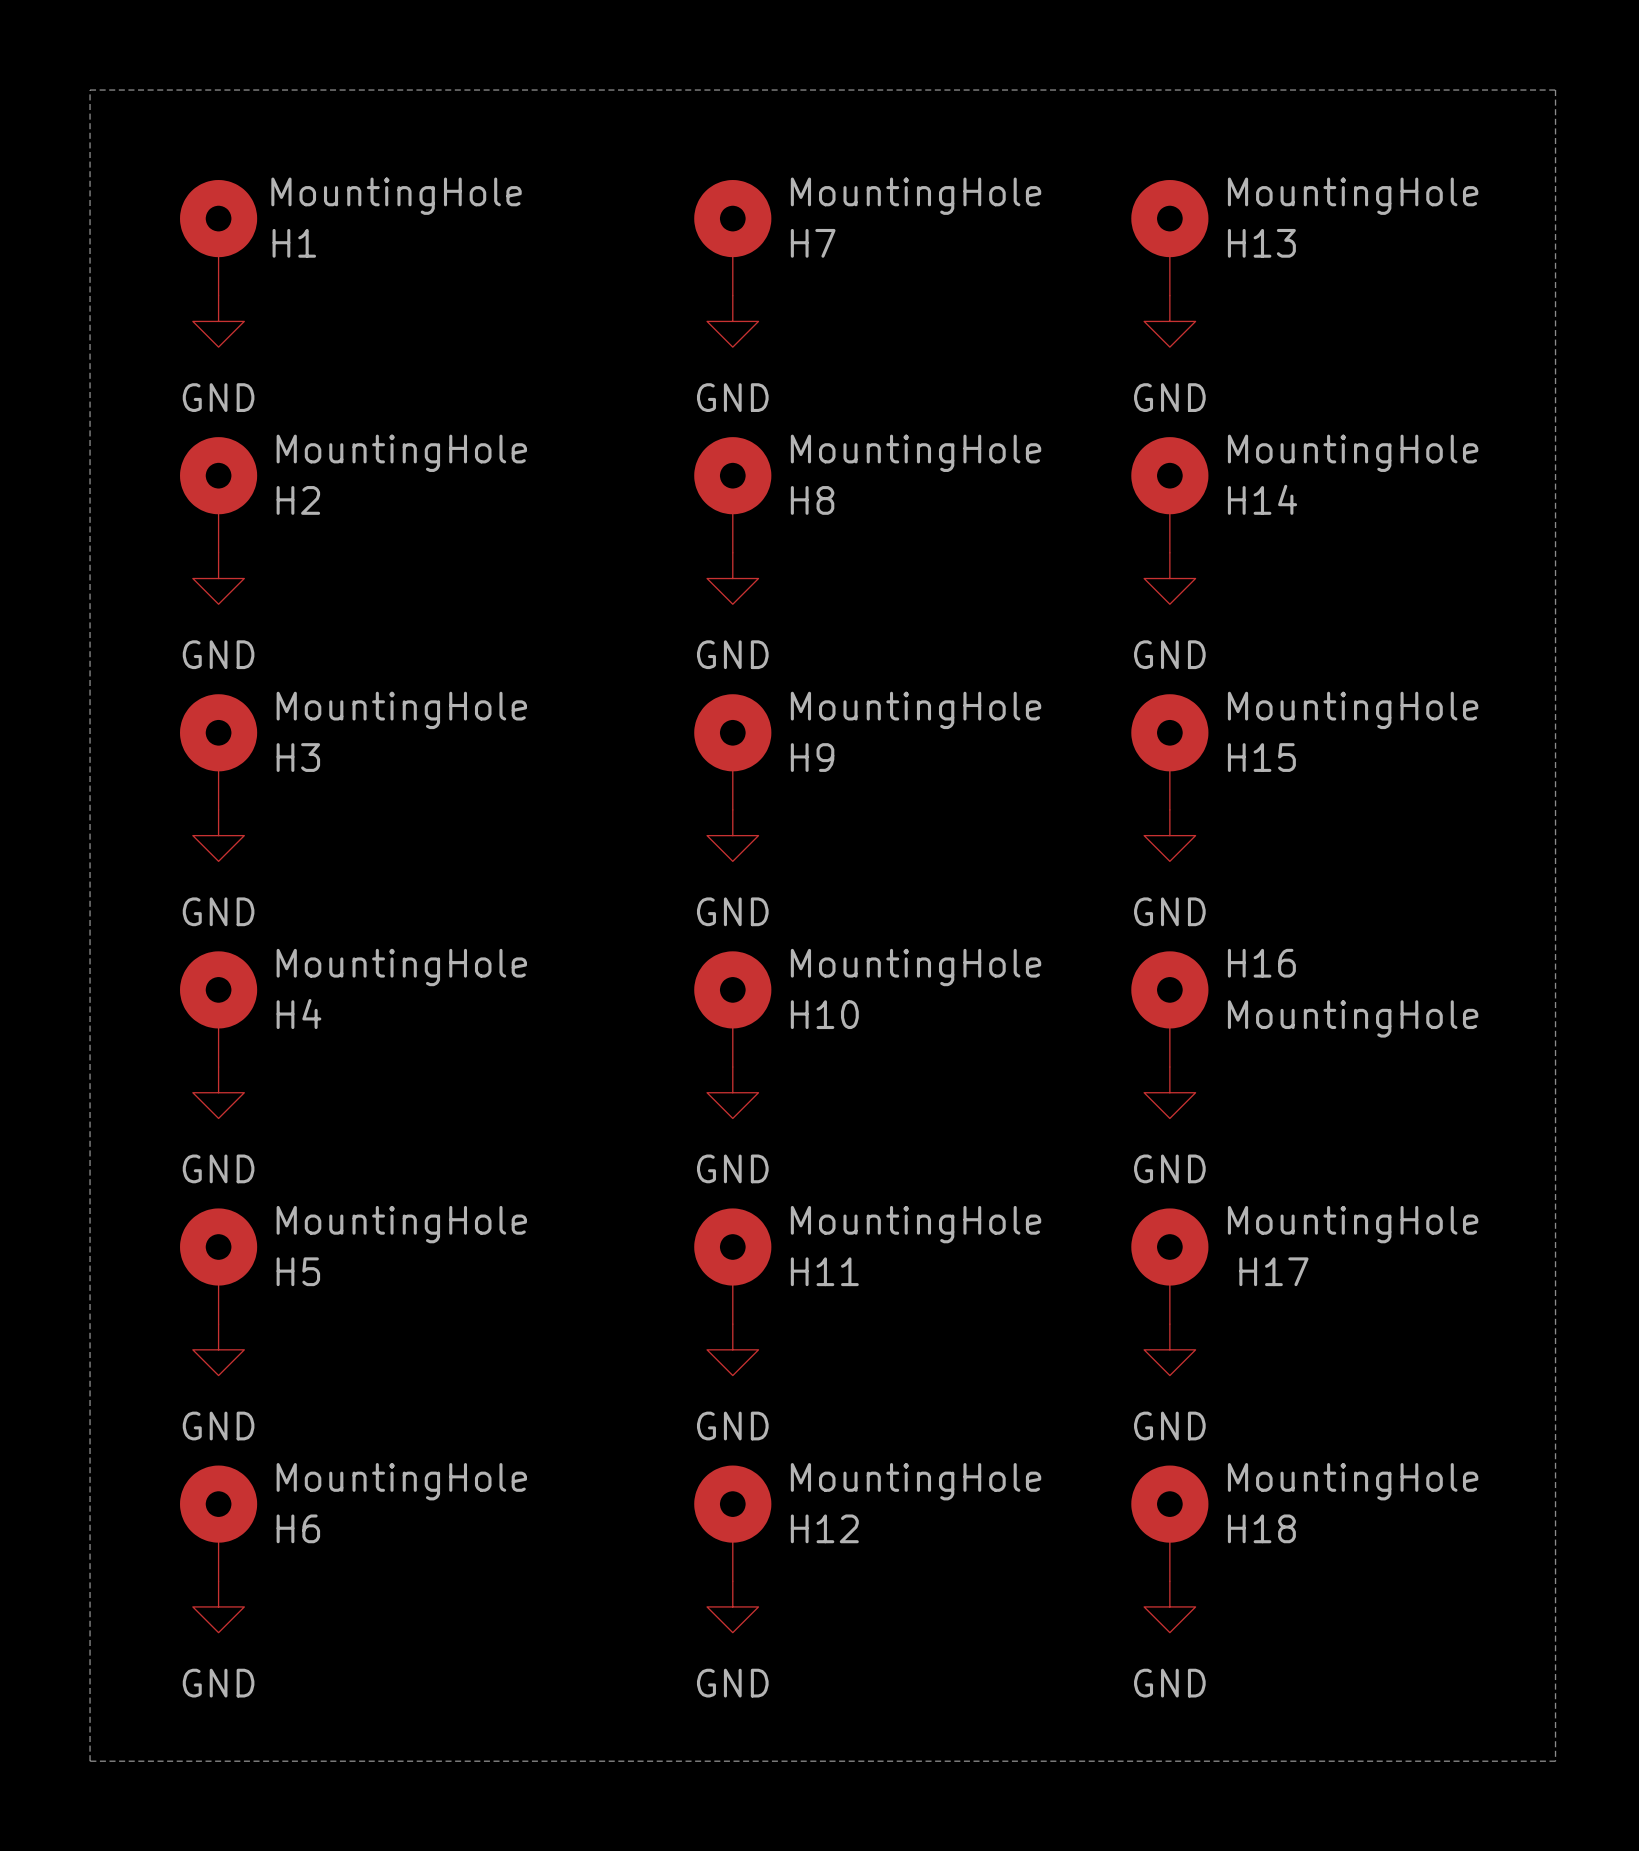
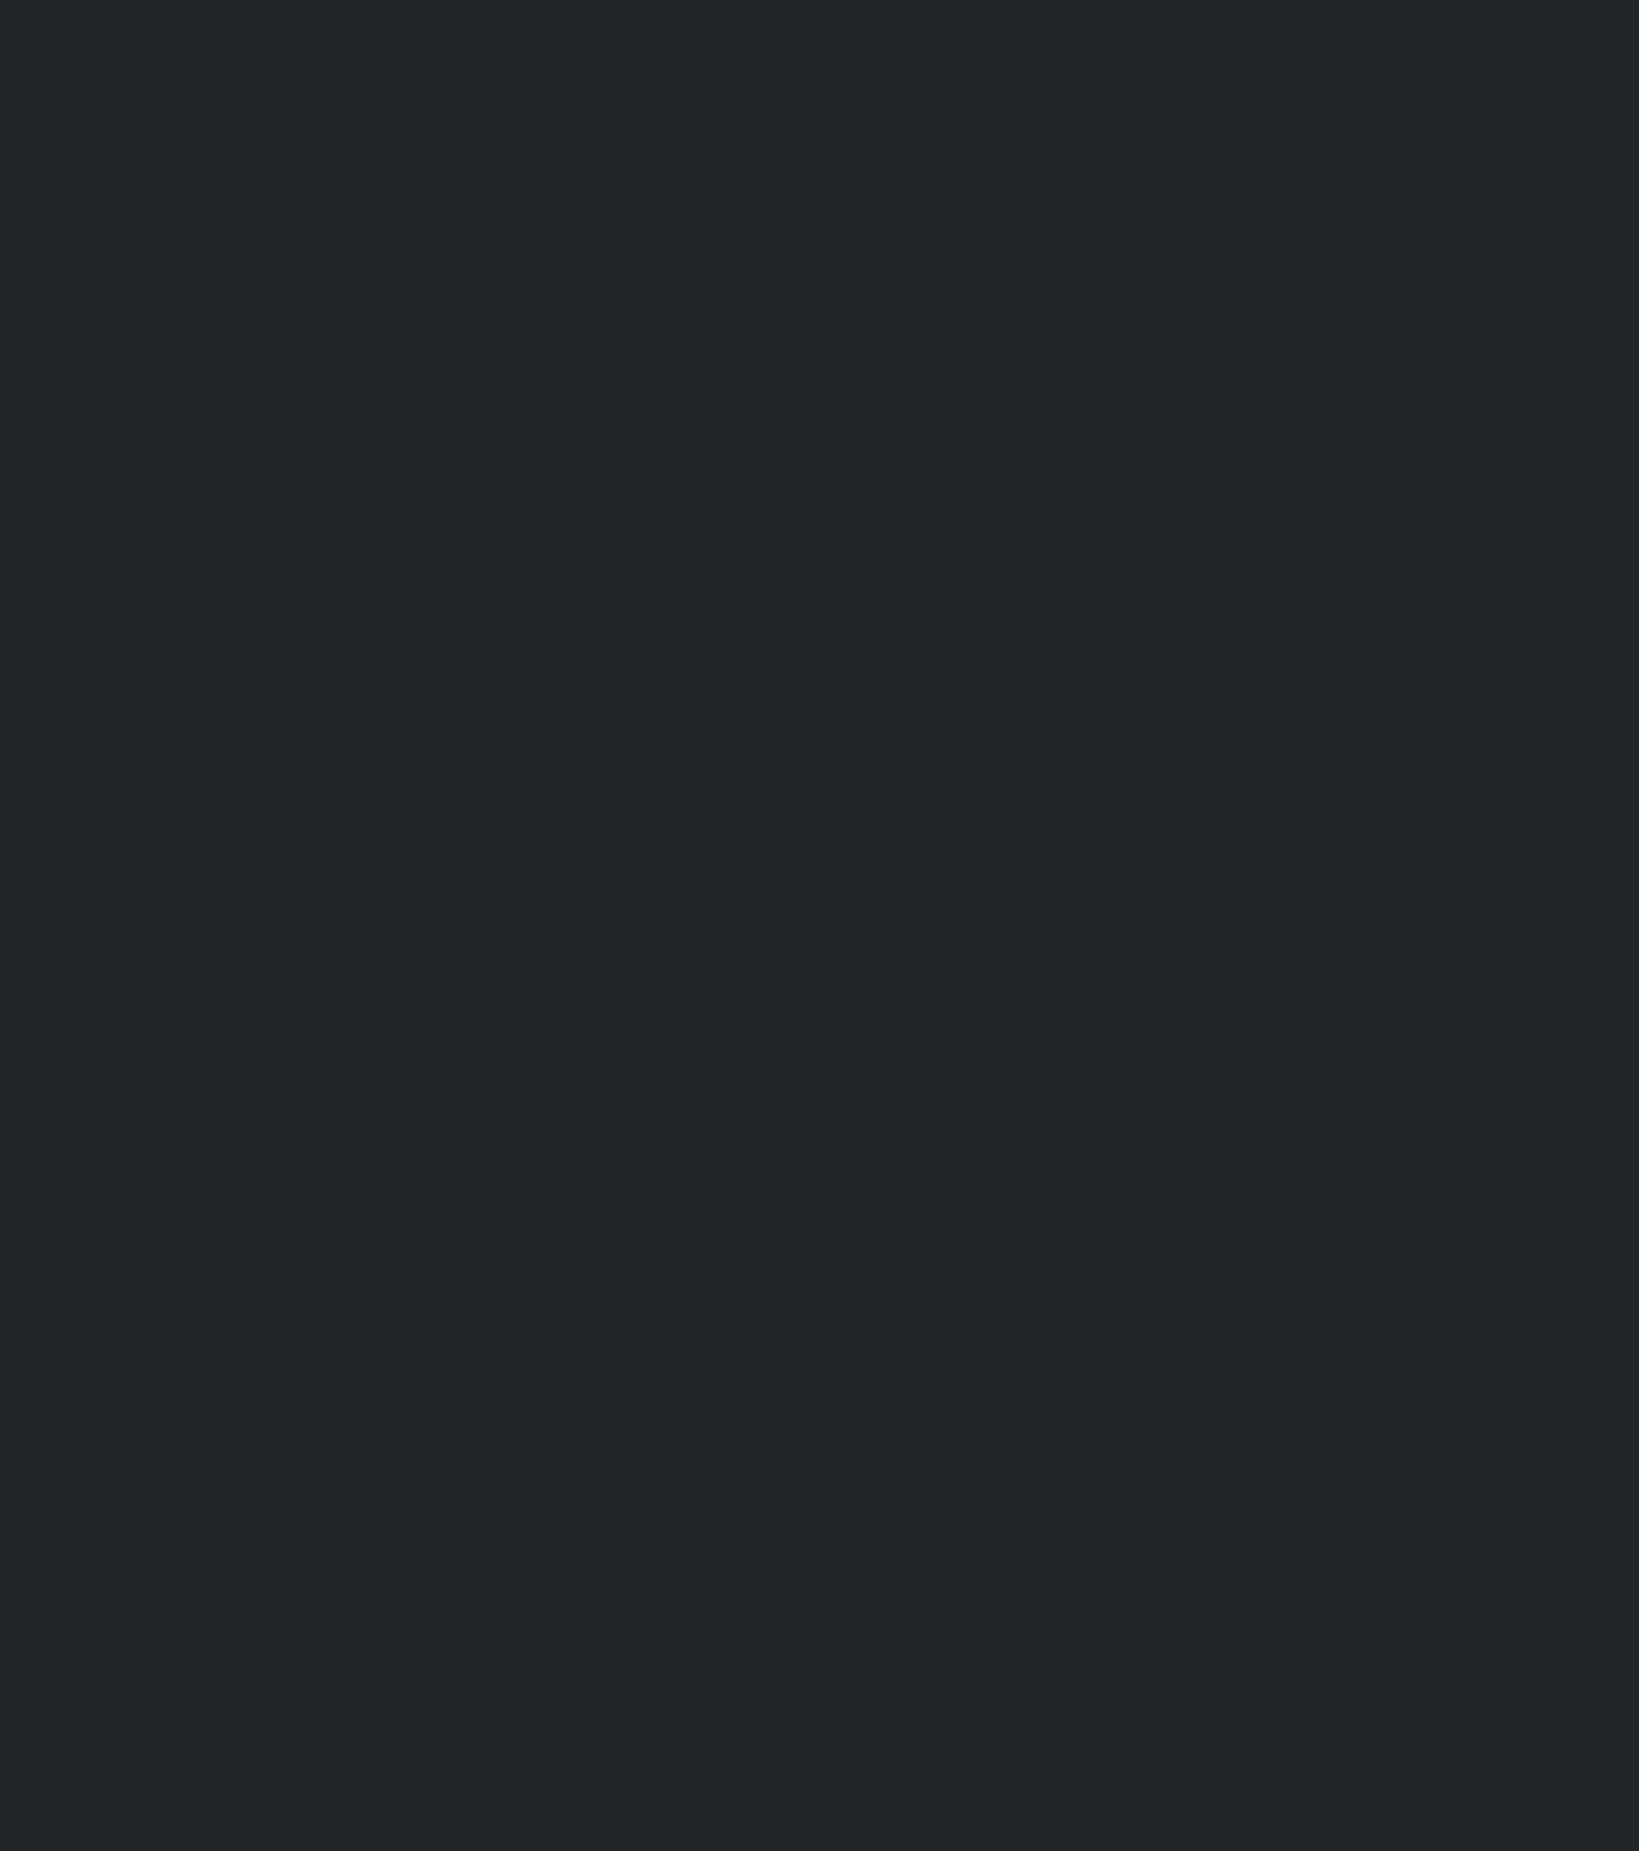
line: (90, 90) (1555, 90) (1555, 1761) (90, 1761) (90, 90) -> none
H1: MountingHole (218, 237) -> none
H7: MountingHole (732, 237) -> none
H13: MountingHole (1169, 237) -> none
power symbol: GND (218, 321) -> none
power symbol: GND (732, 321) -> none
power symbol: GND (1169, 321) -> none
H2: MountingHole (218, 494) -> none
H8: MountingHole (732, 494) -> none
H14: MountingHole (1169, 494) -> none
power symbol: GND (218, 578) -> none
power symbol: GND (732, 578) -> none
power symbol: GND (1169, 578) -> none
H3: MountingHole (218, 752) -> none
H9: MountingHole (732, 752) -> none
H15: MountingHole (1169, 752) -> none
power symbol: GND (218, 835) -> none
power symbol: GND (732, 835) -> none
power symbol: GND (1169, 835) -> none
H4: MountingHole (218, 1009) -> none
H10: MountingHole (732, 1009) -> none
H16: MountingHole (1169, 1009) -> none
power symbol: GND (218, 1092) -> none
power symbol: GND (732, 1092) -> none
power symbol: GND (1169, 1092) -> none
H5: MountingHole (218, 1266) -> none
H11: MountingHole (732, 1266) -> none
H17: MountingHole (1169, 1266) -> none
power symbol: GND (218, 1349) -> none
power symbol: GND (732, 1349) -> none
power symbol: GND (1169, 1349) -> none
H6: MountingHole (218, 1523) -> none
H12: MountingHole (732, 1523) -> none
H18: MountingHole (1169, 1523) -> none
power symbol: GND (218, 1606) -> none
power symbol: GND (732, 1606) -> none
power symbol: GND (1169, 1606) -> none

